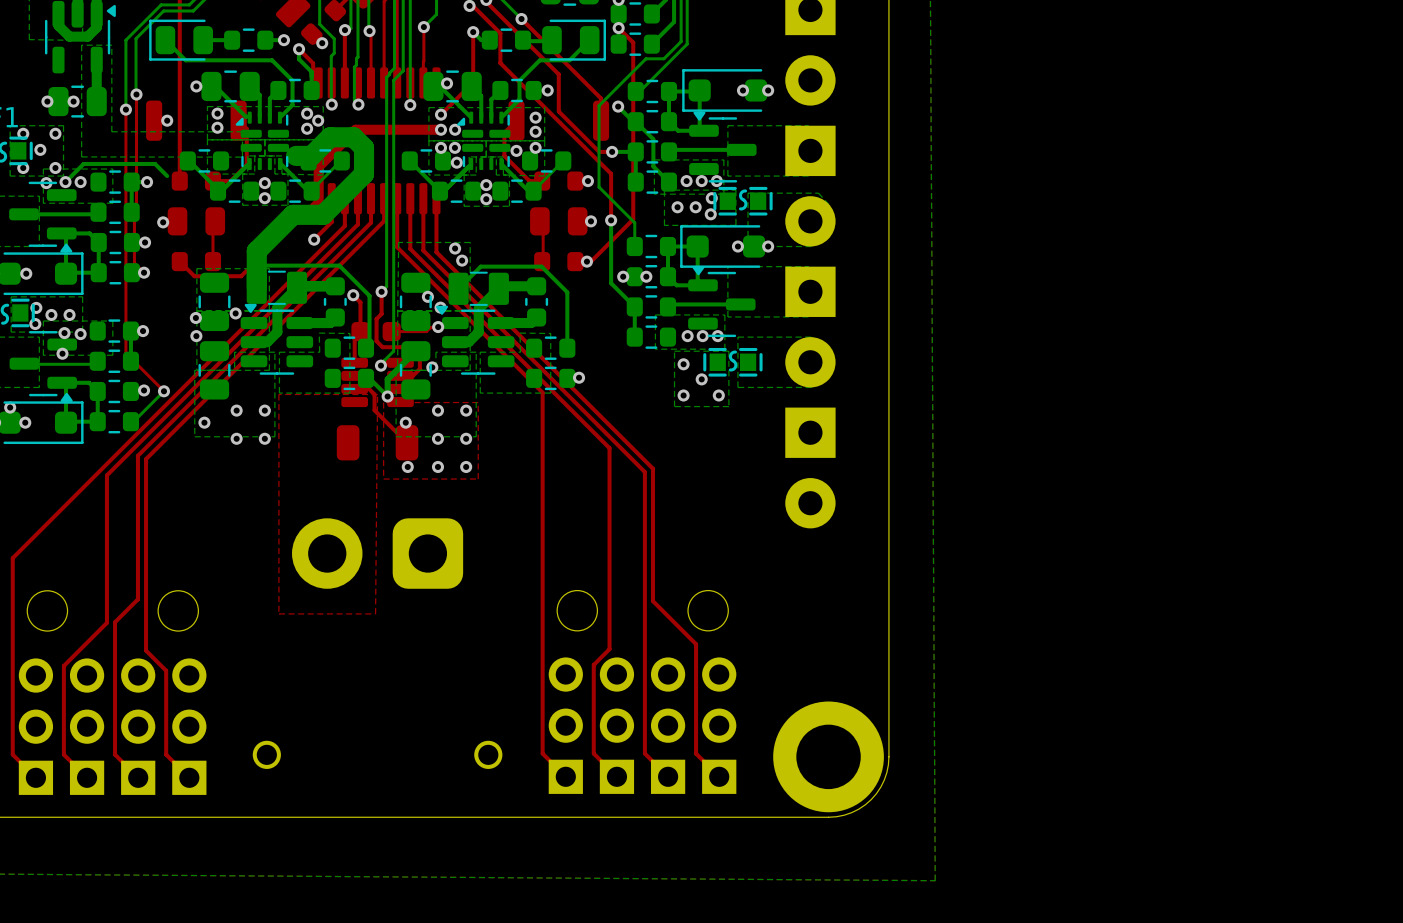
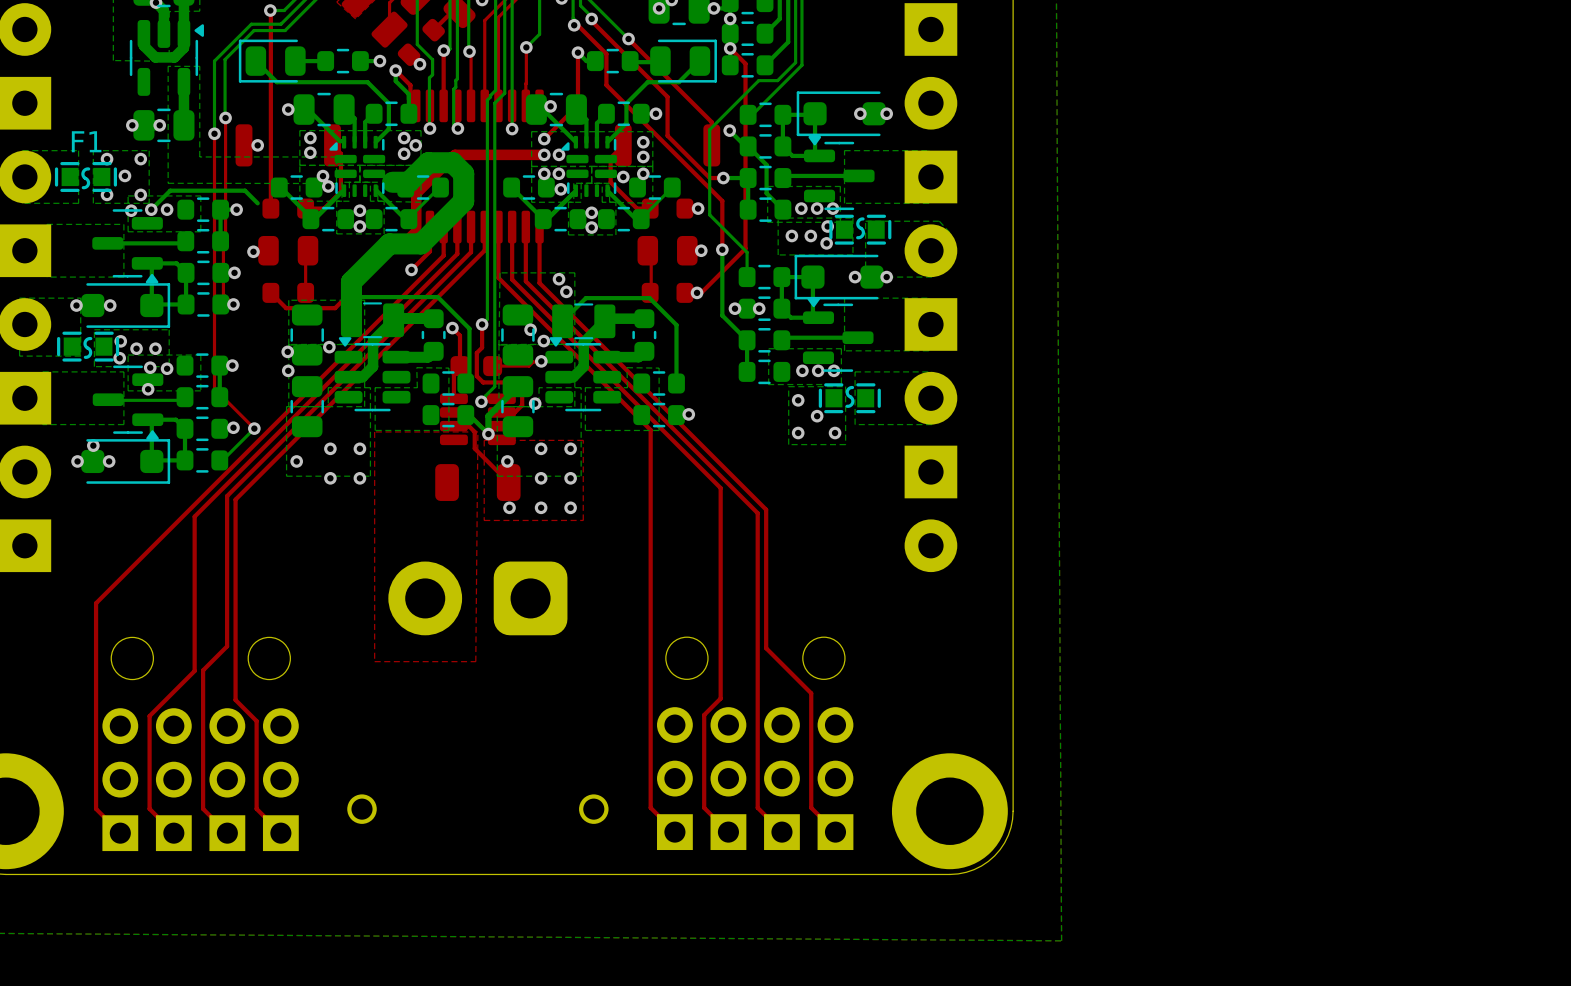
via: none -> (322, 176)
via: none -> (328, 186)
part footprint: [435, 305, 515, 375] -> [545, 337, 622, 412]

